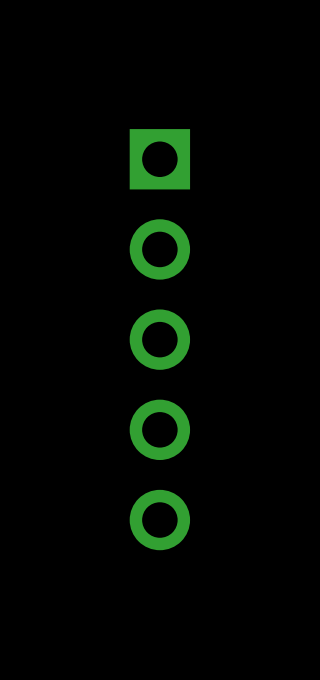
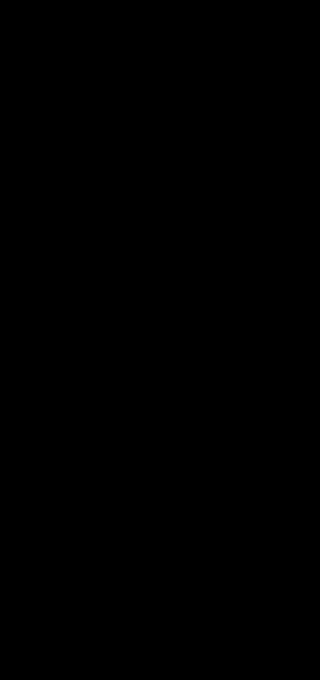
part: (159, 339) -> none

